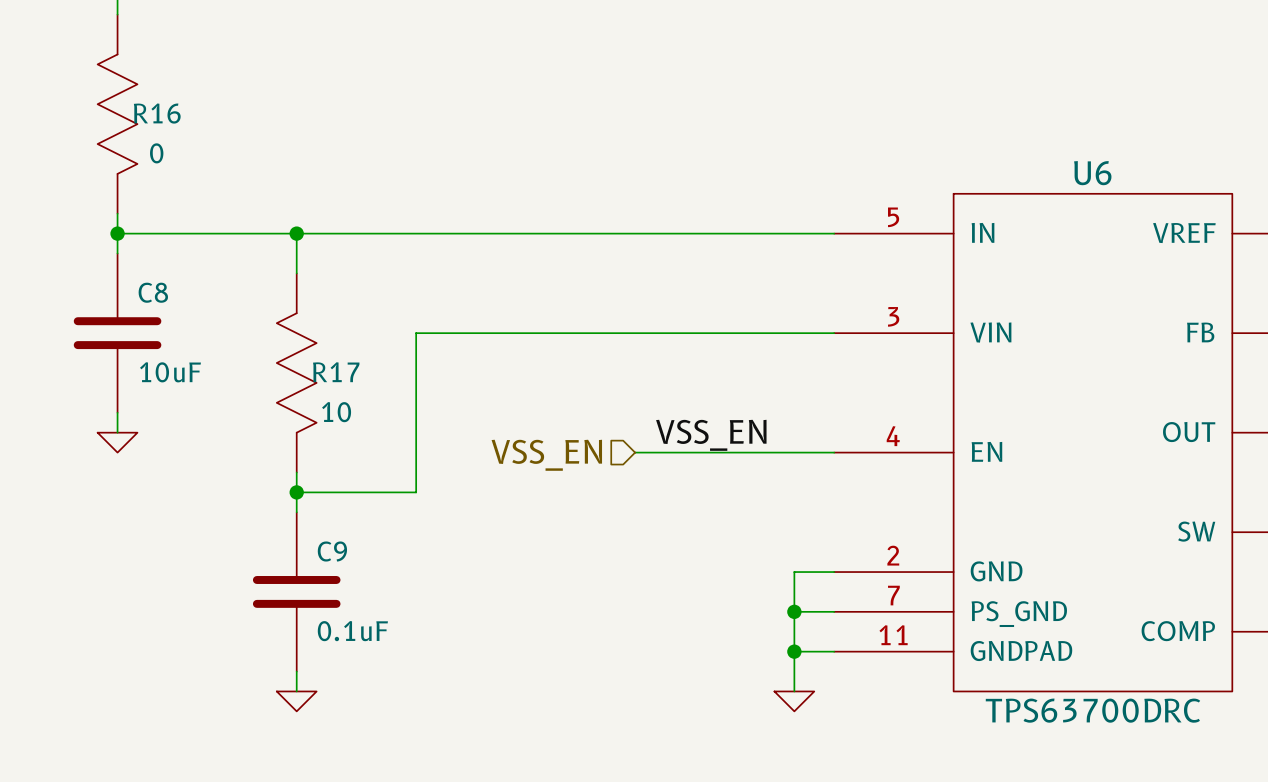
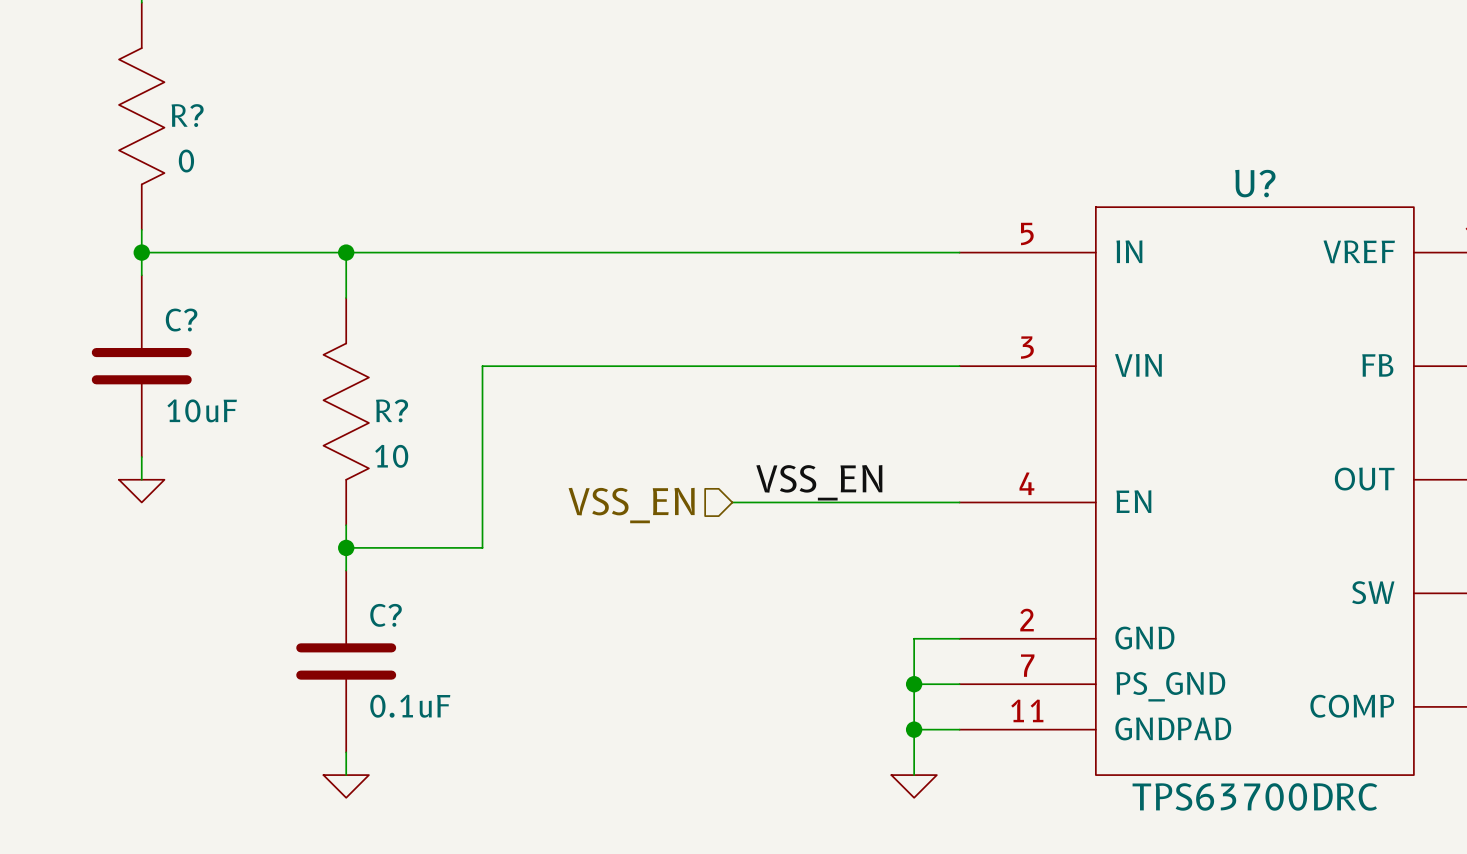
R16 name: R16 (157, 113) -> R? (187, 115)
U6 name: U6 (1092, 173) -> U? (1255, 183)
C8 name: C8 (153, 292) -> C? (181, 320)
R17 name: R17 (336, 372) -> R? (392, 410)
C9 name: C9 (332, 551) -> C? (386, 615)

